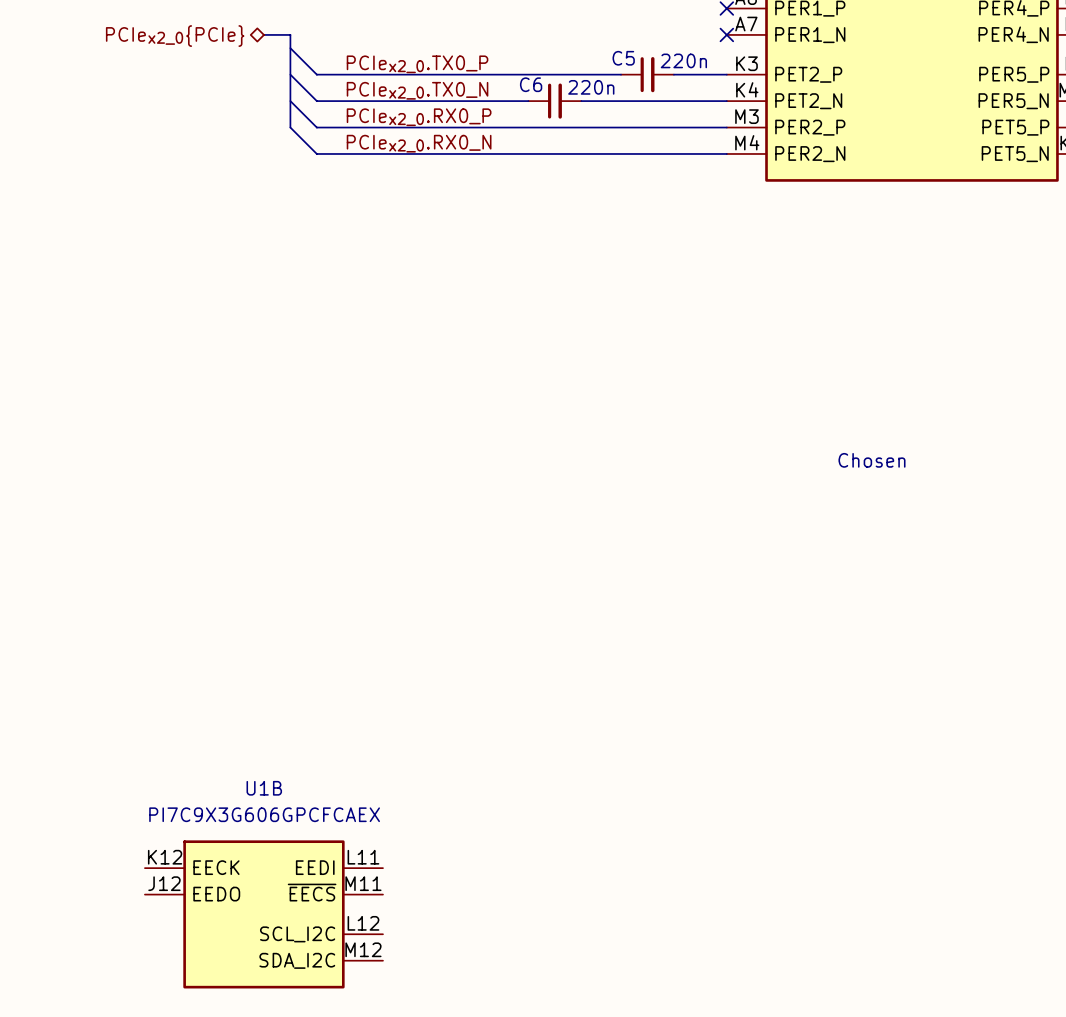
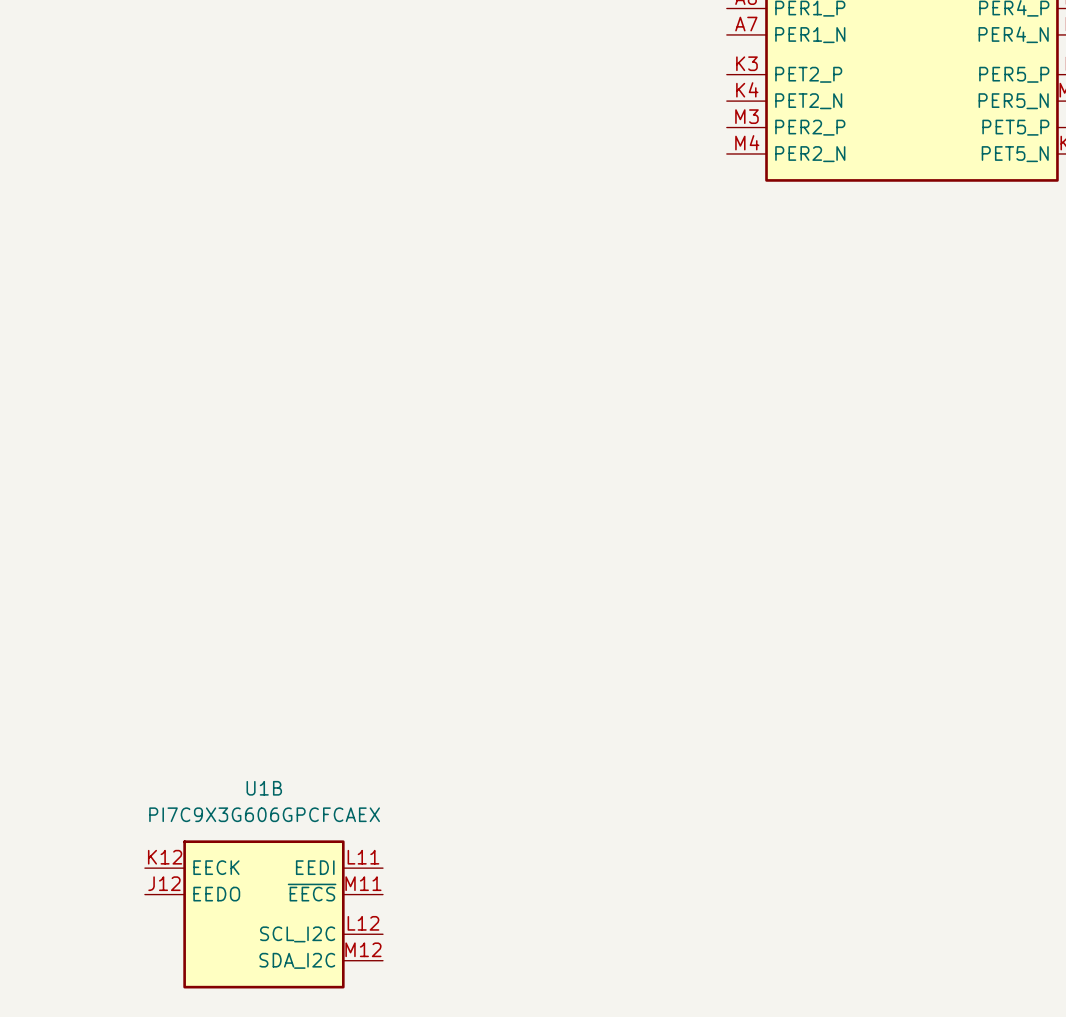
no-connect mark: (726, 8) -> none
bus: (263, 34) (290, 34) (290, 127) -> none
no-connect mark: (726, 34) -> none
hierarchical label: PCIex2_0{PCIe} (175, 36) -> none
wire: (290, 48) (316, 74) (621, 74) -> none
label: PCIex2_0.TX0_P (417, 64) -> none
wire: (290, 74) (316, 101) (528, 101) -> none
C5: (647, 74) -> none
wire: (673, 74) (726, 74) -> none
label: PCIex2_0.TX0_N (417, 90) -> none
wire: (290, 101) (316, 127) (726, 127) -> none
C6: (554, 101) -> none
wire: (581, 101) (726, 101) -> none
label: PCIex2_0.RX0_P (419, 117) -> none
wire: (290, 127) (316, 153) (726, 153) -> none
label: PCIex2_0.RX0_N (419, 143) -> none
text: Chosen (871, 460) -> none

